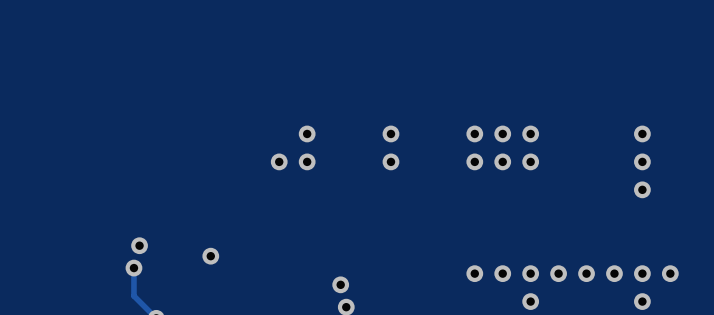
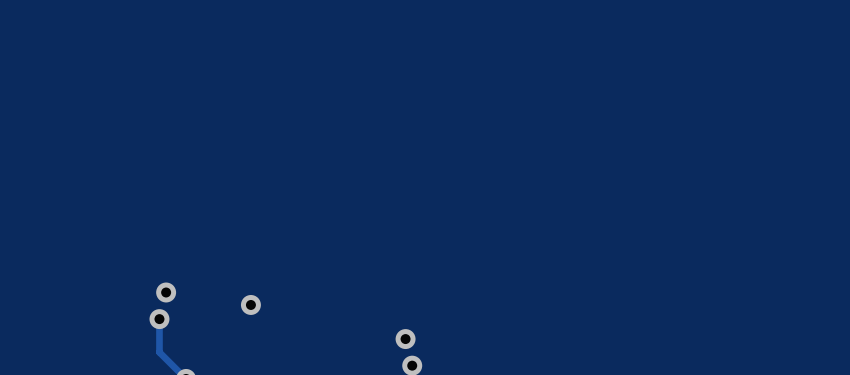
via: (307, 133) -> none
via: (390, 133) -> none
via: (474, 133) -> none
via: (502, 133) -> none
via: (530, 133) -> none
via: (642, 133) -> none
via: (279, 161) -> none
via: (307, 161) -> none
via: (390, 161) -> none
via: (474, 161) -> none
via: (502, 161) -> none
via: (530, 161) -> none
via: (642, 161) -> none
via: (642, 189) -> none
via: (474, 273) -> none
via: (502, 273) -> none
via: (530, 273) -> none
via: (558, 273) -> none
via: (586, 273) -> none
via: (614, 273) -> none
via: (642, 273) -> none
via: (670, 273) -> none
via: (530, 301) -> none
via: (642, 301) -> none

